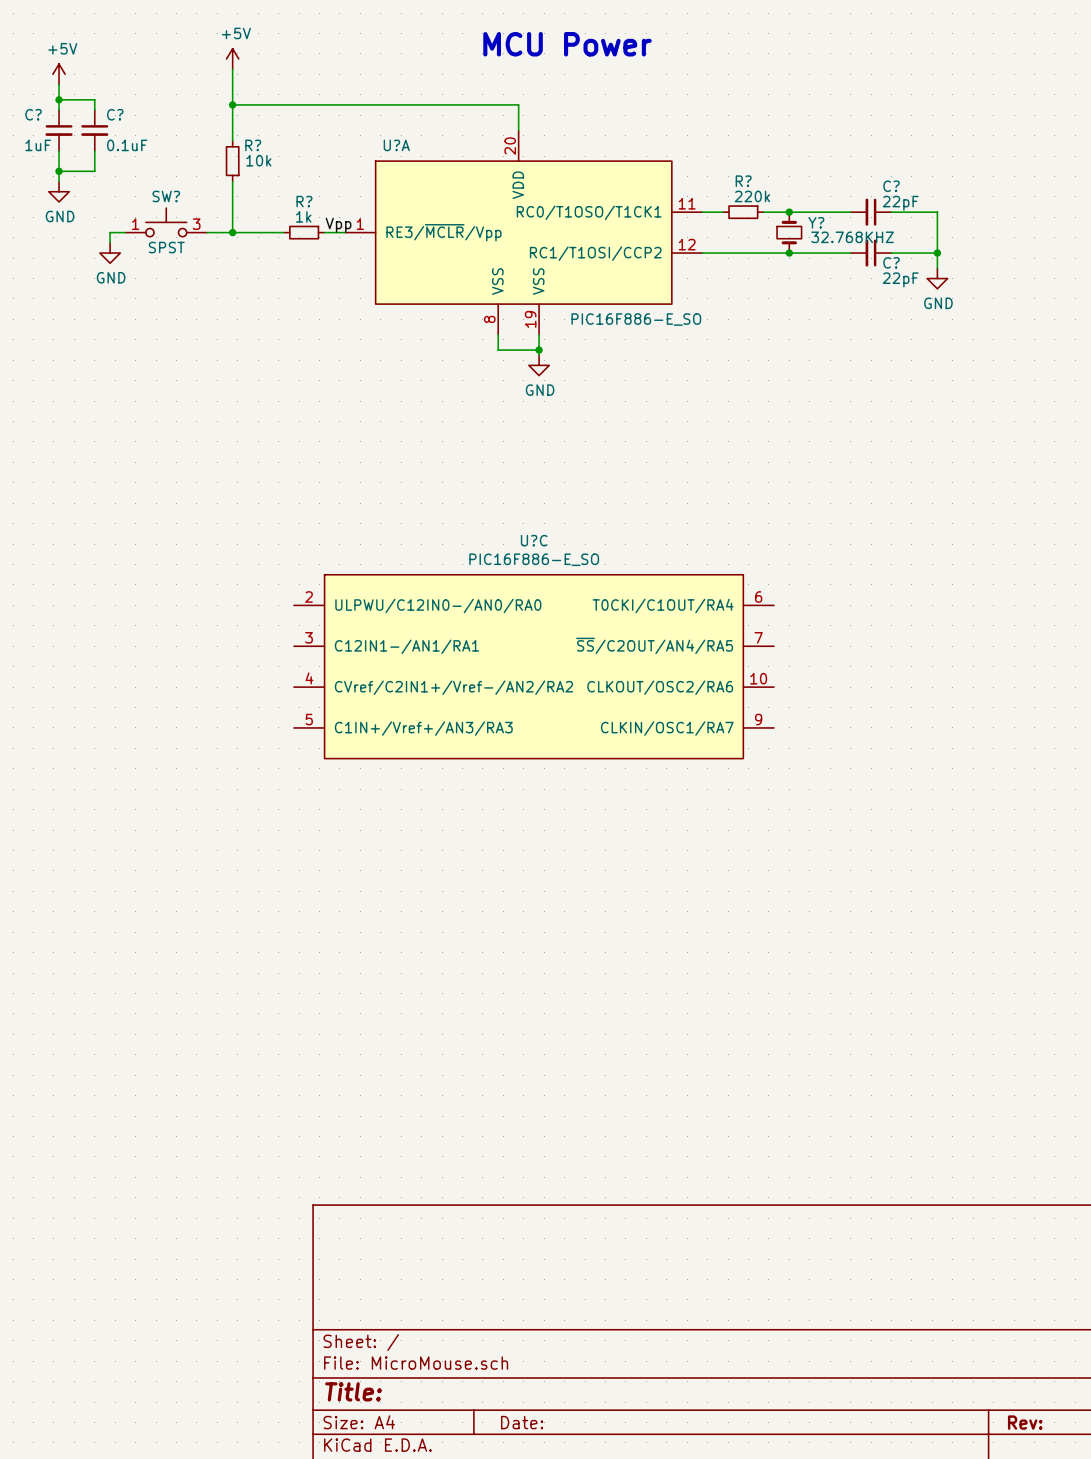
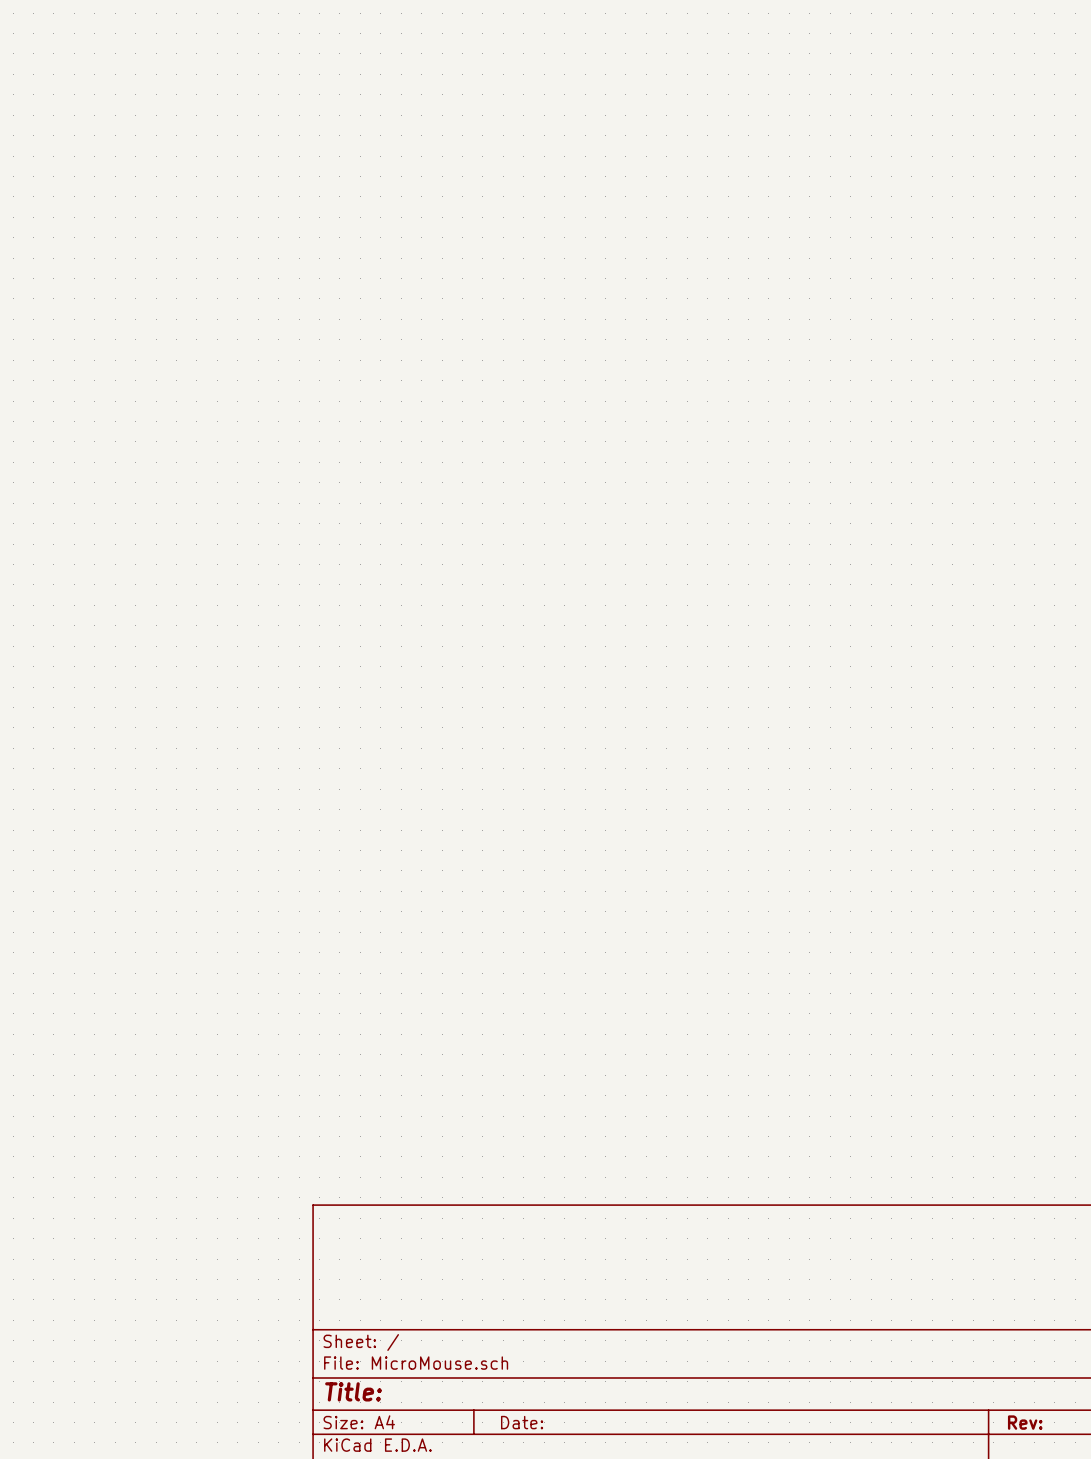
text: MCU Power (567, 44) -> none
power symbol: +5V (232, 58) -> none
wire: (232, 69) (232, 140) -> none
power symbol: +5V (59, 74) -> none
wire: (59, 84) (59, 110) -> none
wire: (59, 99) (94, 99) (94, 110) -> none
junction: (59, 99) -> none
wire: (232, 104) (518, 104) (518, 130) -> none
junction: (232, 104) -> none
C?: 1uF (59, 130) -> none
C?: 0.1uF (94, 130) -> none
wire: (59, 150) (59, 181) -> none
wire: (94, 150) (94, 171) (59, 171) -> none
R?: 10k (232, 161) -> none
junction: (59, 171) -> none
wire: (232, 181) (232, 232) -> none
power symbol: GND (59, 191) -> none
wire: (702, 212) (722, 212) -> none
R?: 220k (743, 212) -> none
wire: (763, 212) (850, 212) -> none
junction: (789, 212) -> none
C?: 22pF (871, 212) -> none
wire: (891, 212) (937, 212) (937, 268) -> none
SW?: SPST (166, 222) -> none
label: Vpp (338, 225) -> none
wire: (125, 232) (110, 232) (110, 242) -> none
wire: (207, 232) (283, 232) -> none
junction: (232, 232) -> none
R?: 1k (304, 232) -> none
wire: (324, 232) (345, 232) -> none
U?A: PIC16F886-E_SO (523, 232) -> none
Y?: 32.768KHZ (789, 232) -> none
power symbol: GND (110, 253) -> none
wire: (702, 253) (850, 253) -> none
junction: (789, 253) -> none
C?: 22pF (871, 253) -> none
wire: (891, 253) (937, 253) -> none
junction: (937, 253) -> none
power symbol: GND (937, 278) -> none
wire: (498, 334) (498, 350) (539, 350) -> none
wire: (539, 334) (539, 355) -> none
junction: (539, 350) -> none
power symbol: GND (539, 365) -> none
U?C: PIC16F886-E_SO (533, 666) -> none

